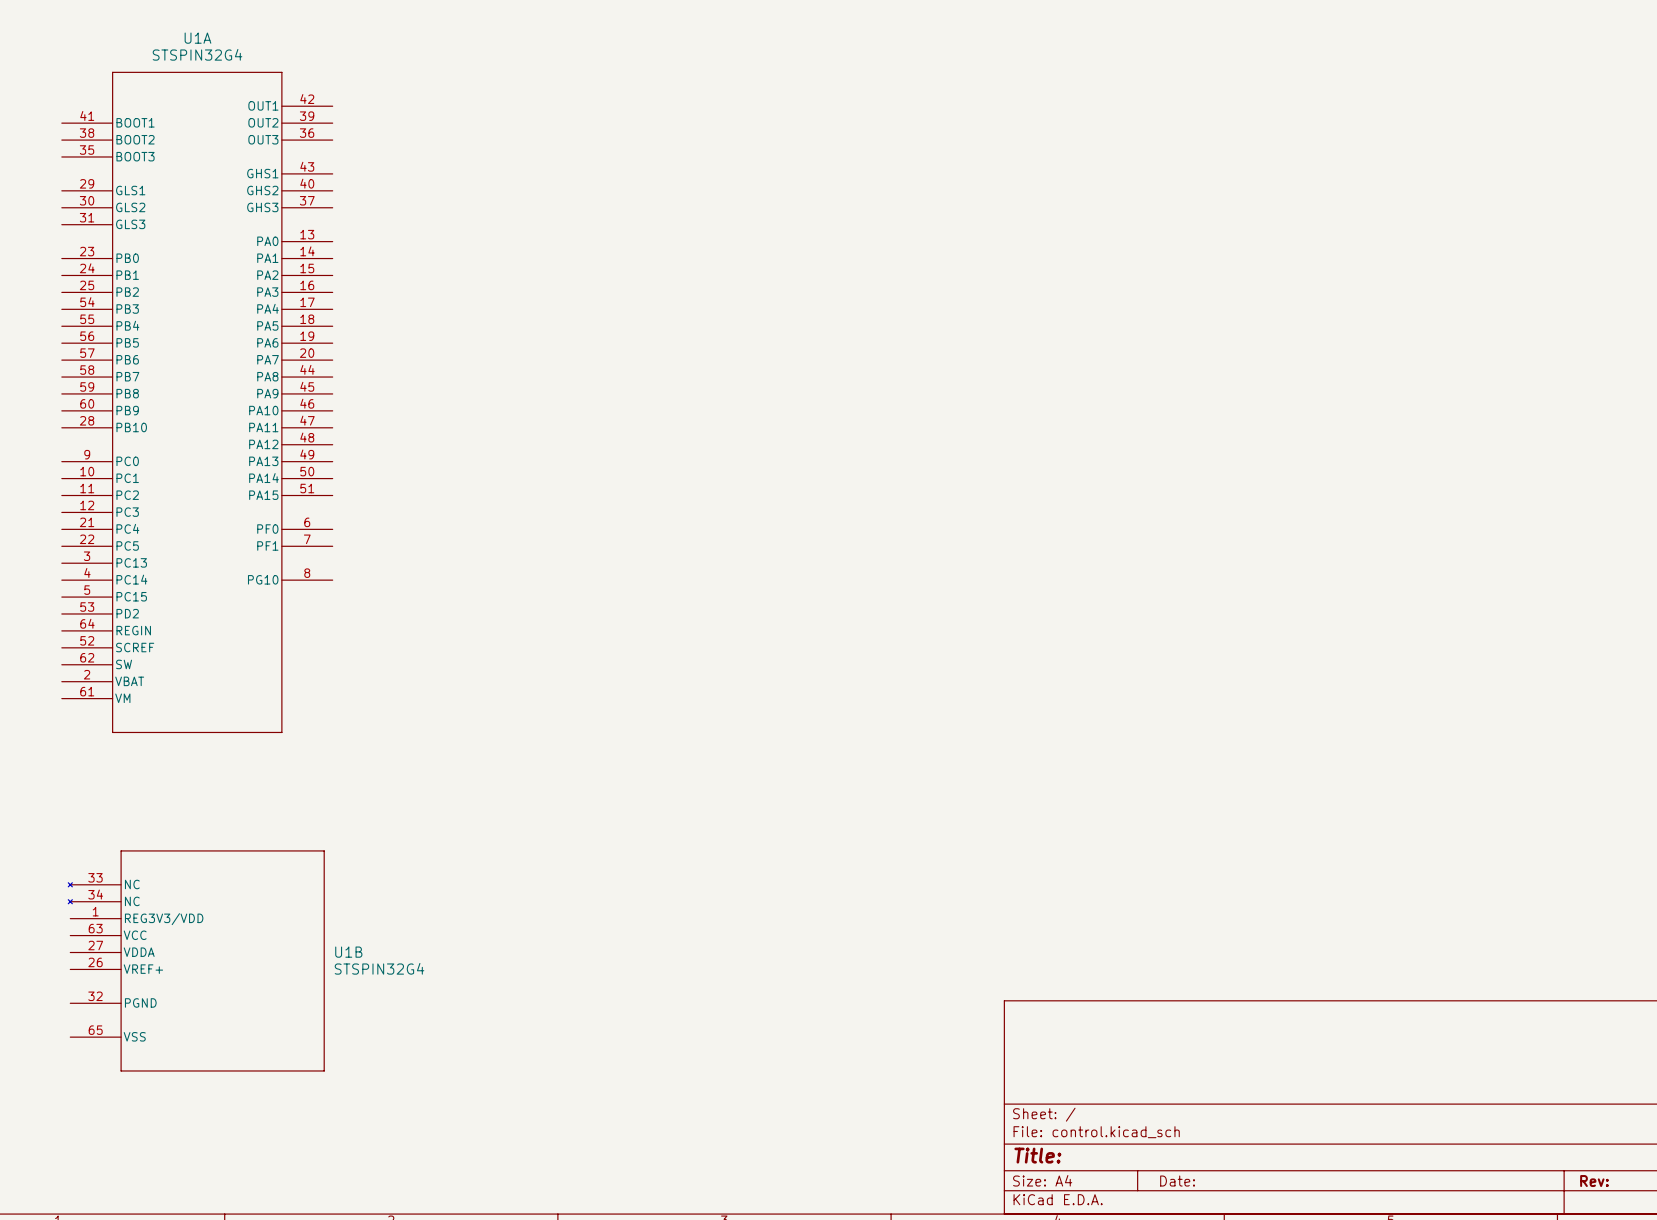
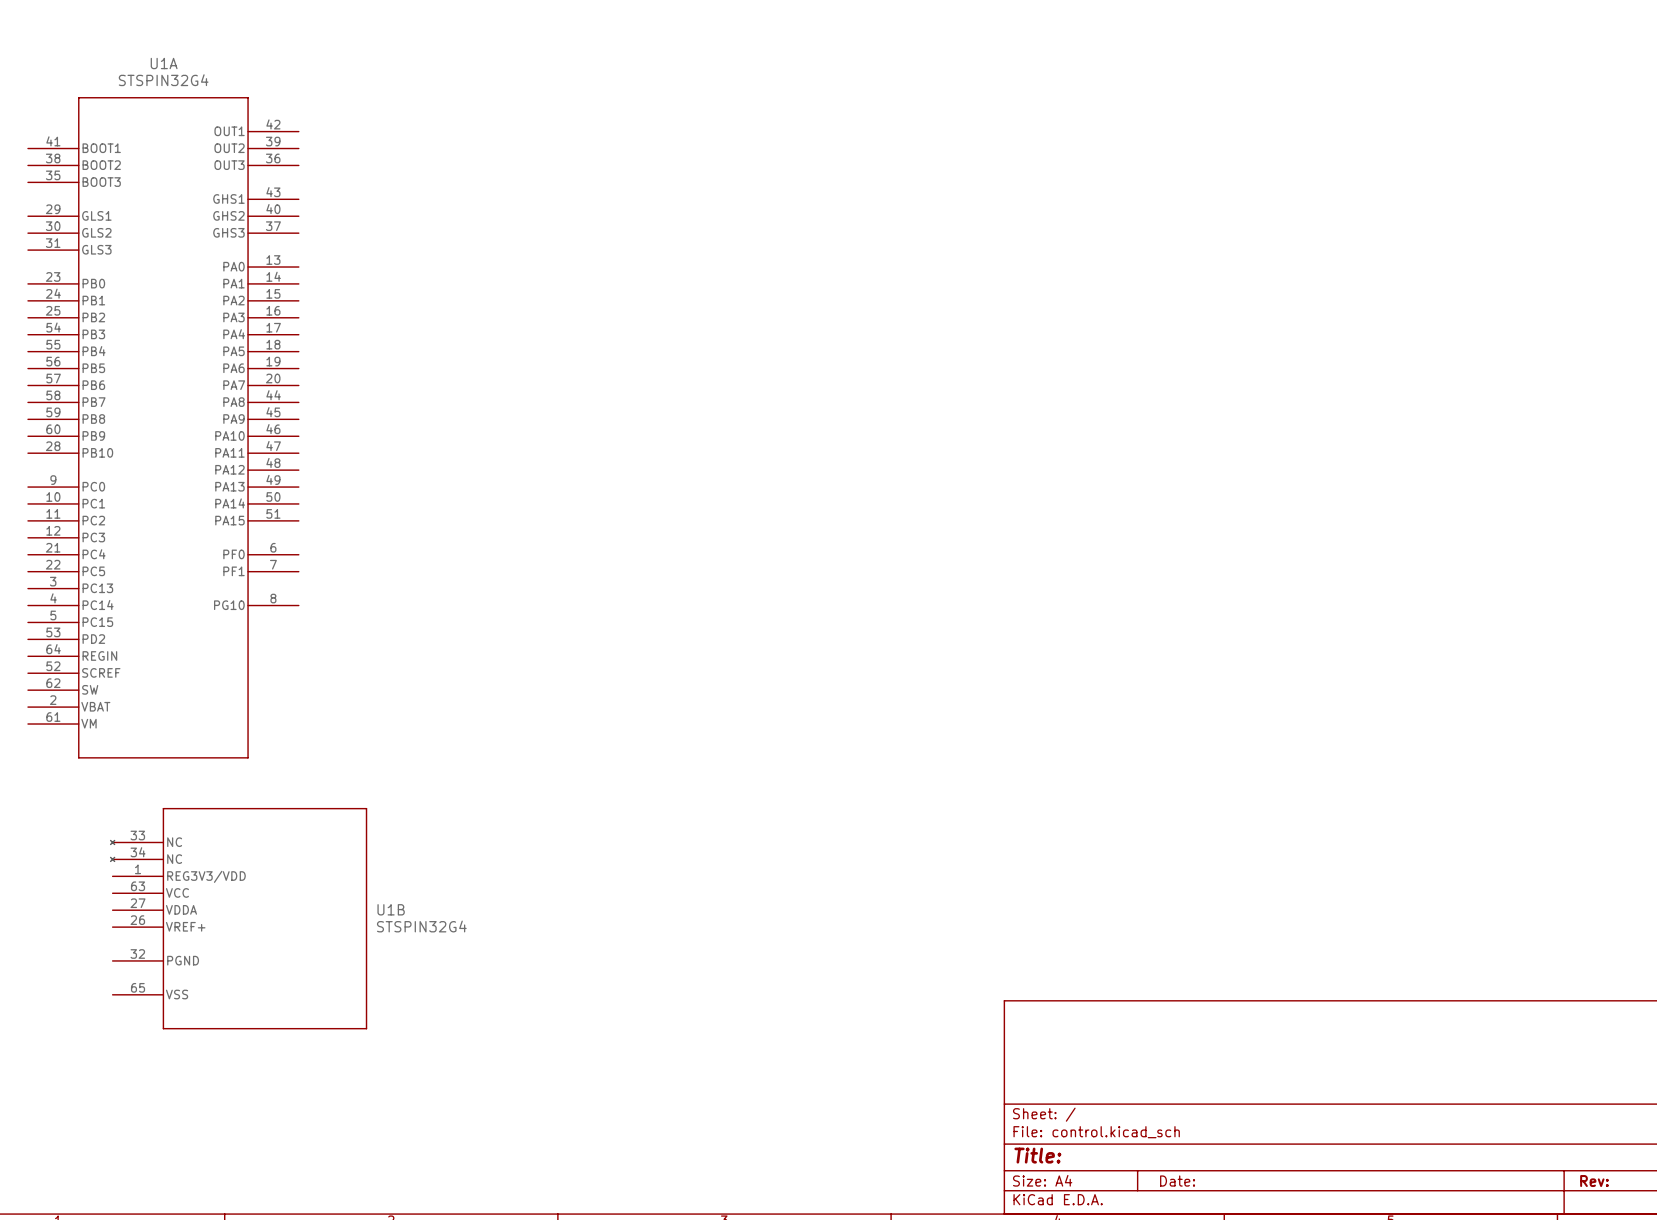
U1A position: (197, 402) -> (163, 427)
U1B position: (196, 960) -> (238, 918)

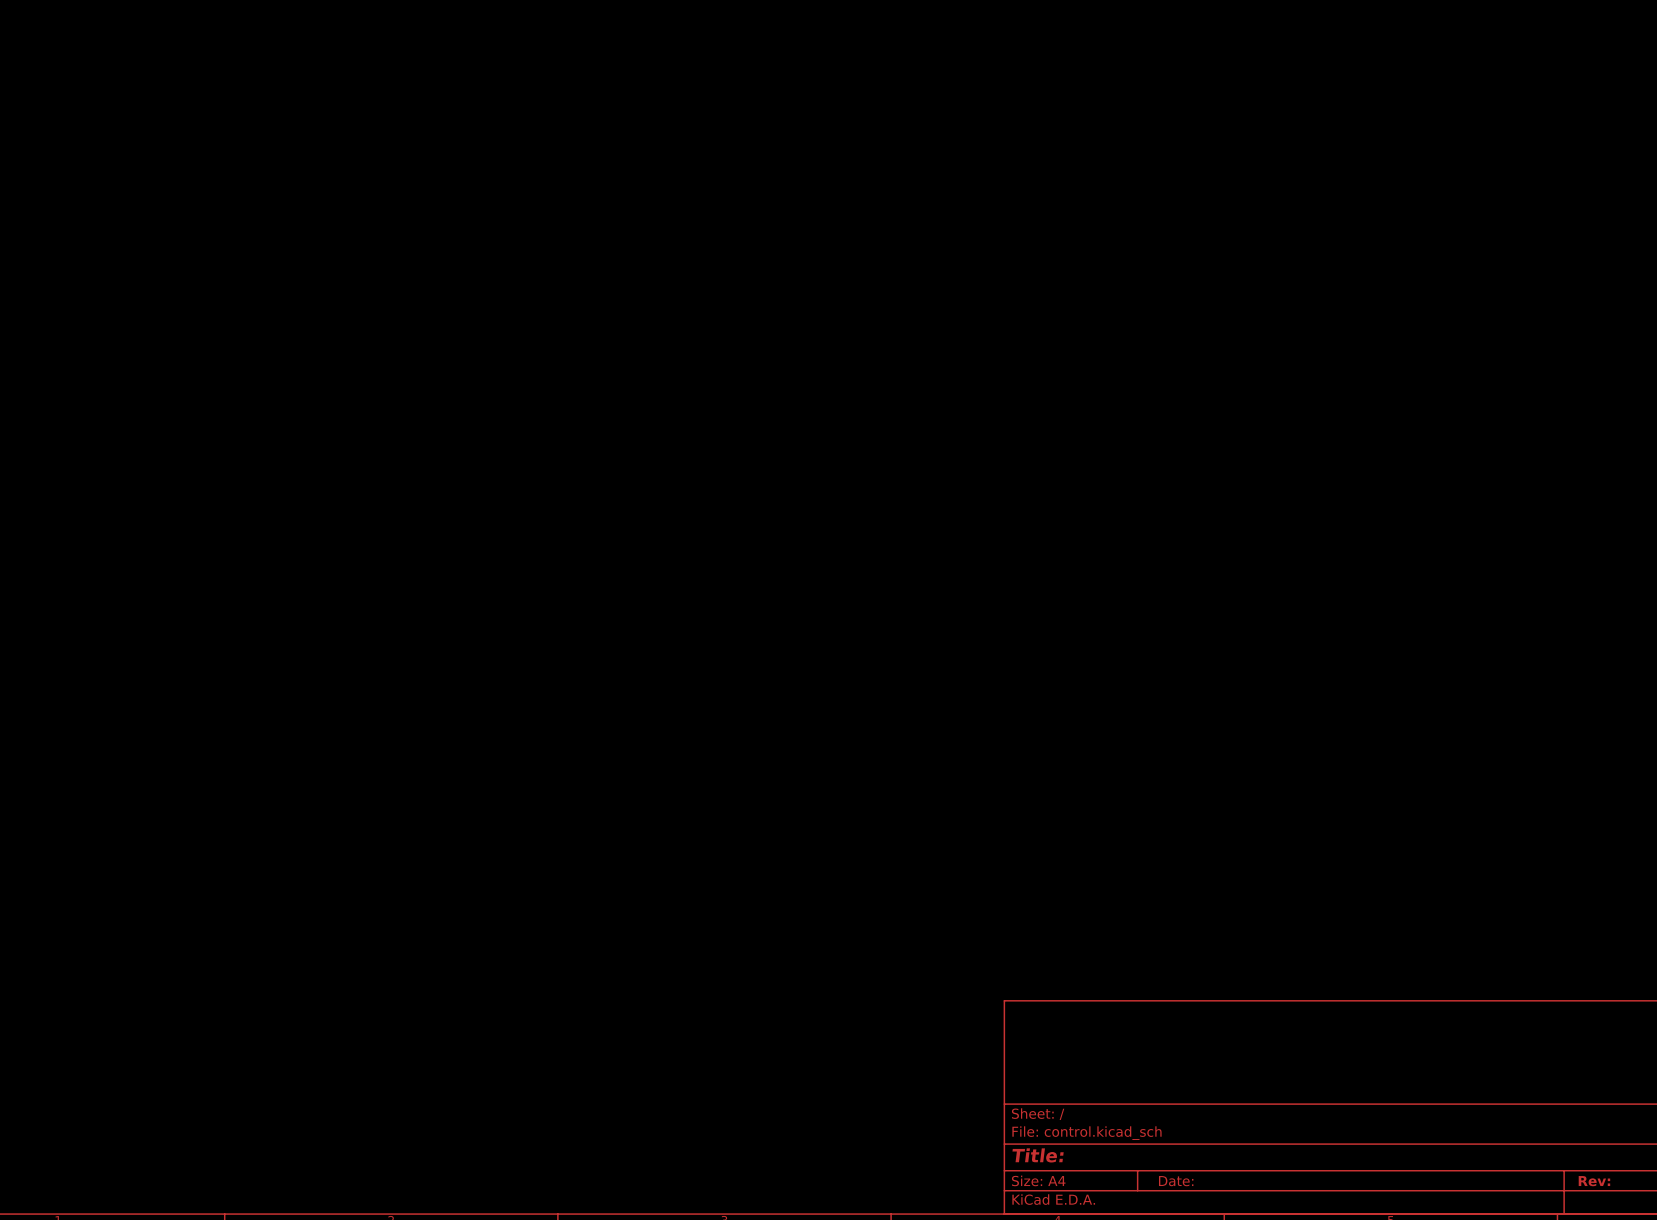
U1A: STSPIN32G4 (163, 427) -> none
U1B: STSPIN32G4 (238, 918) -> none

